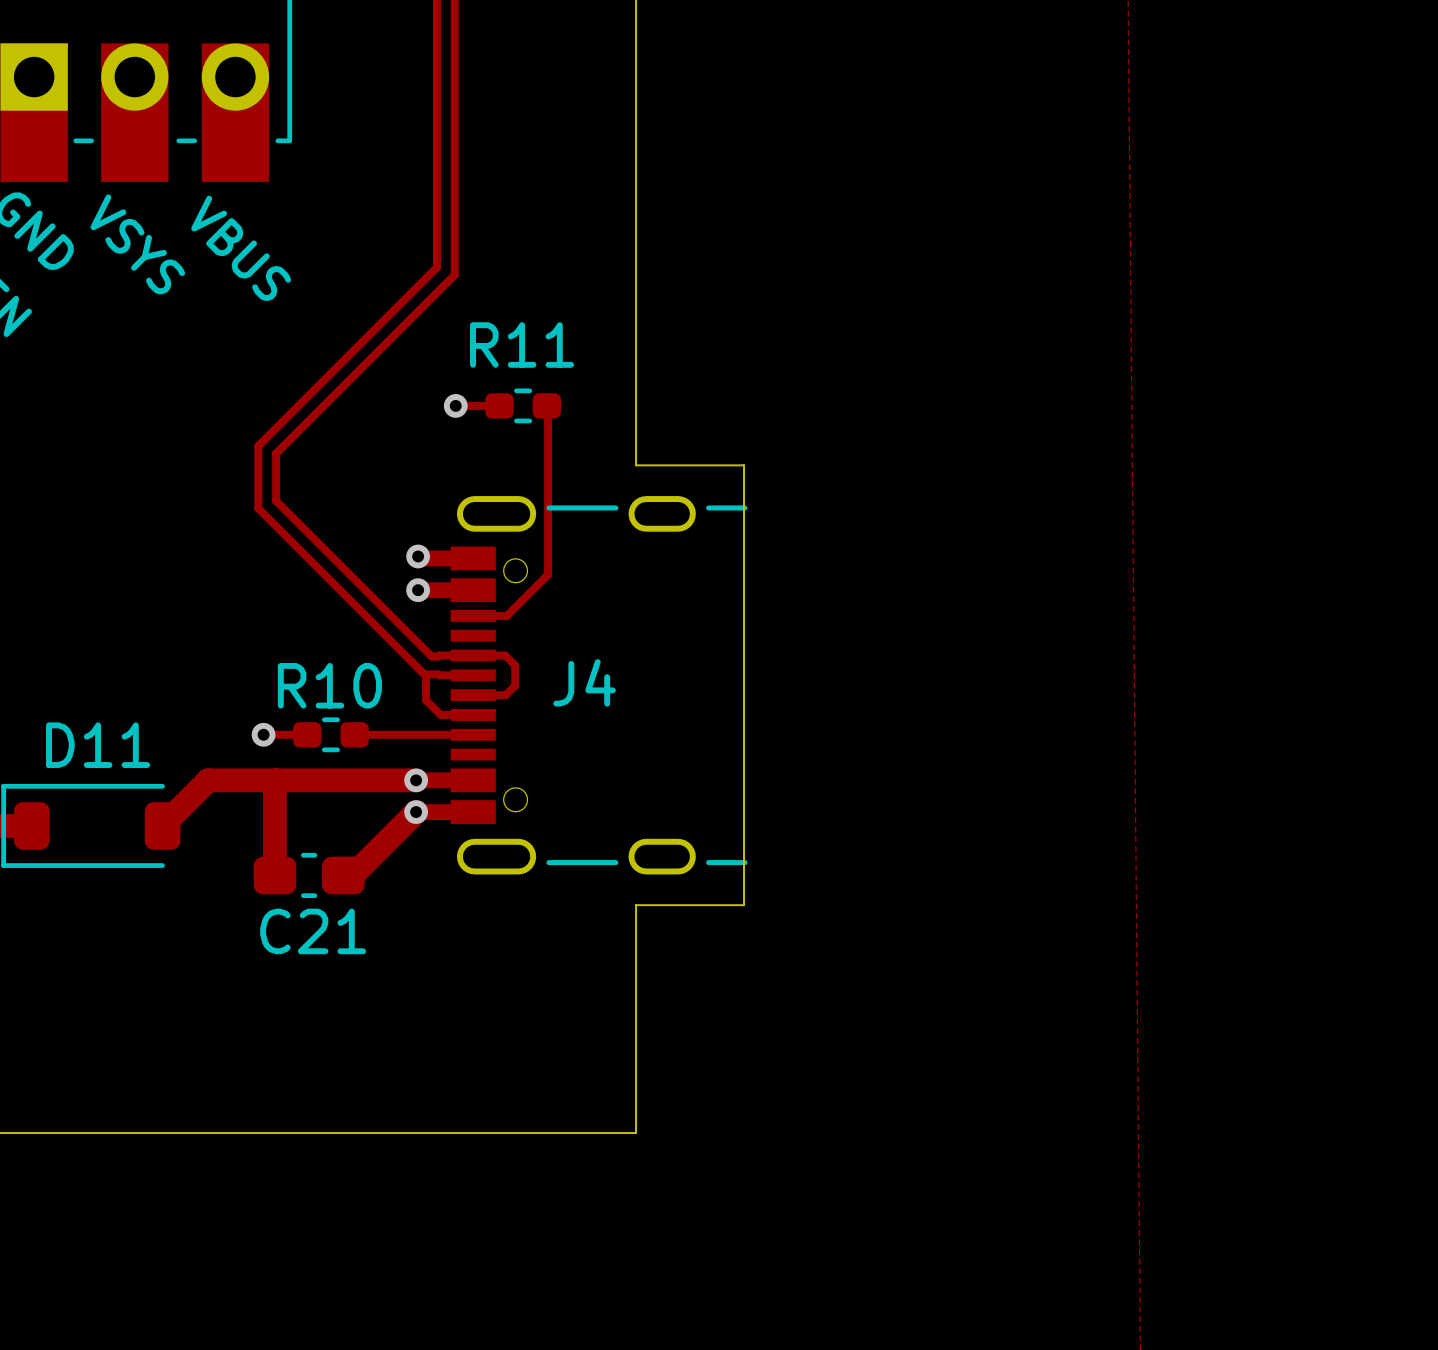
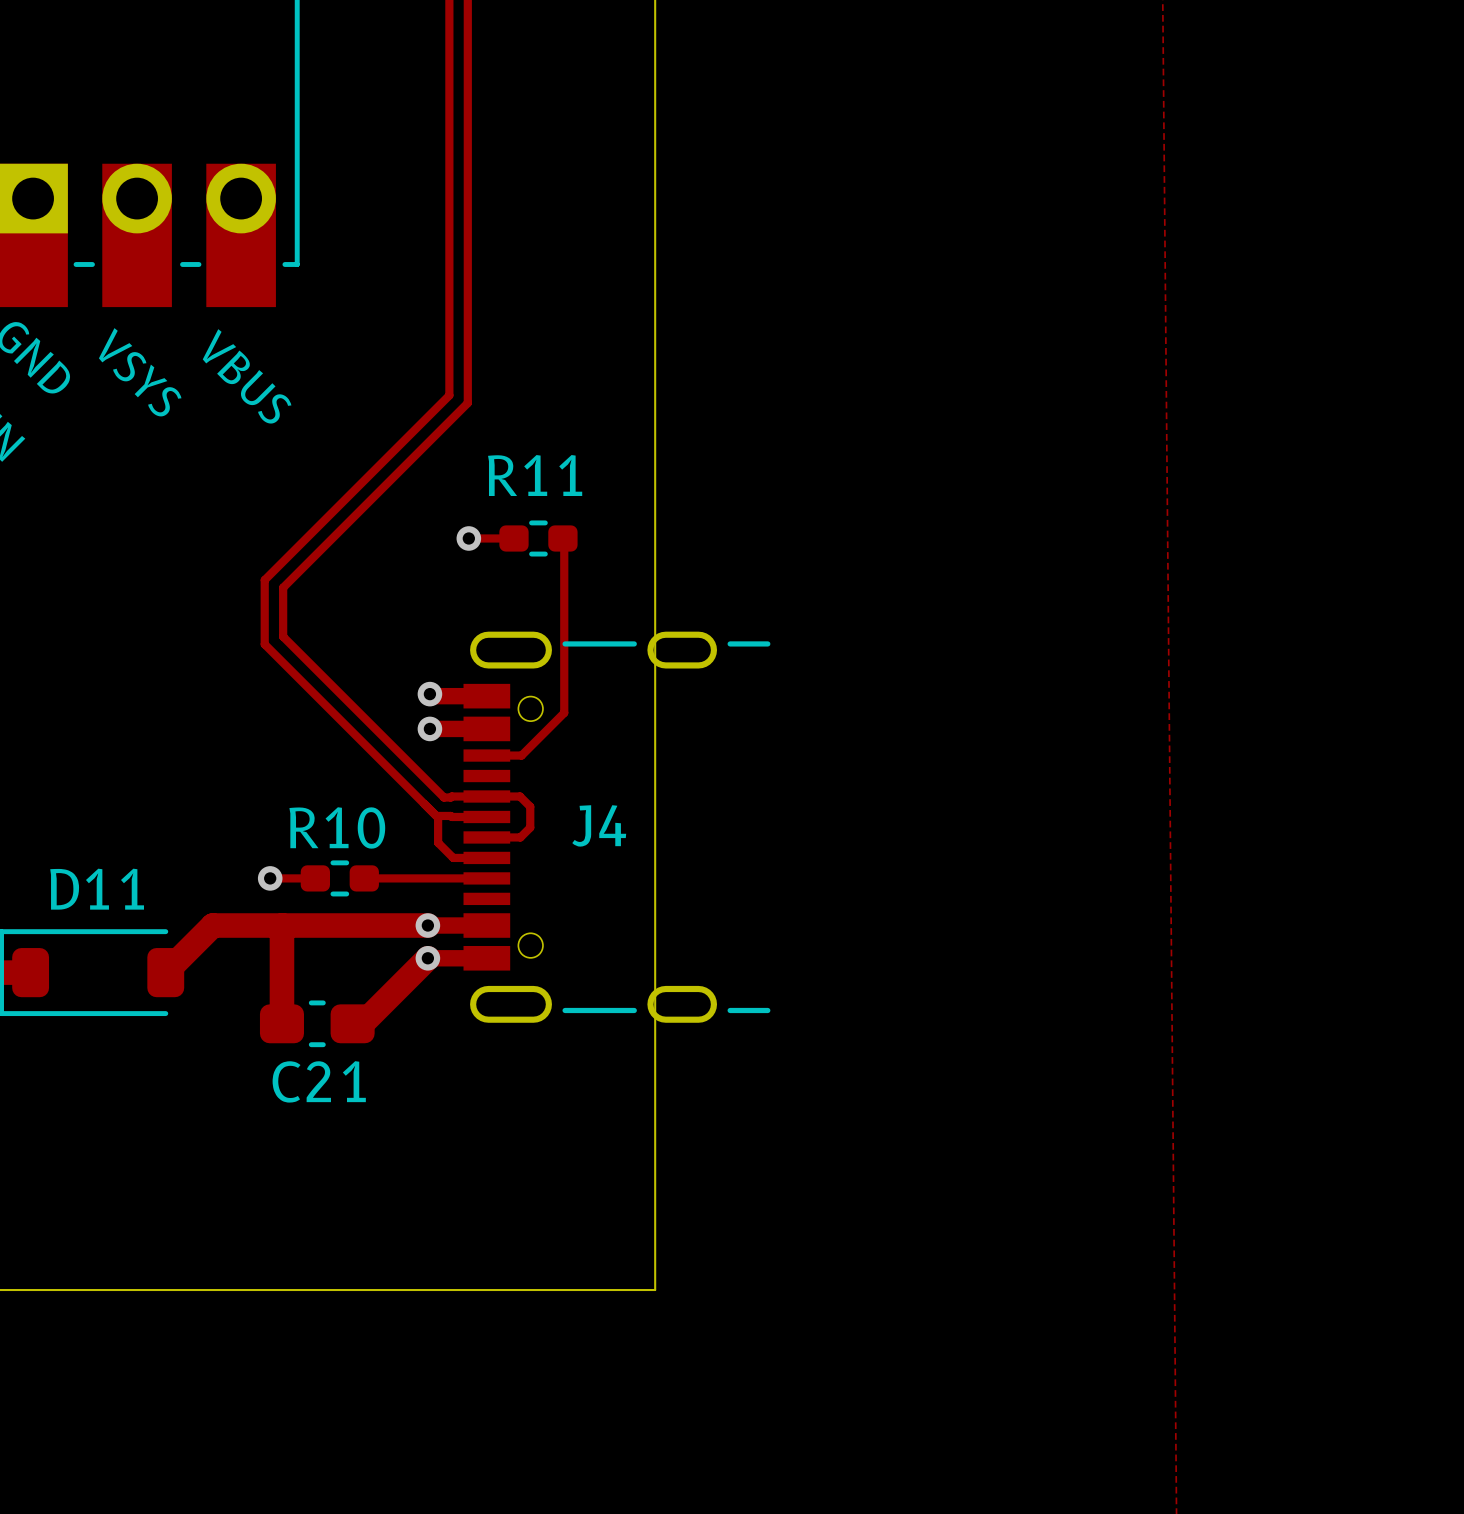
board edge: (636, 465) (744, 465) (744, 905) (636, 905) -> (655, 599) (655, 1054)

